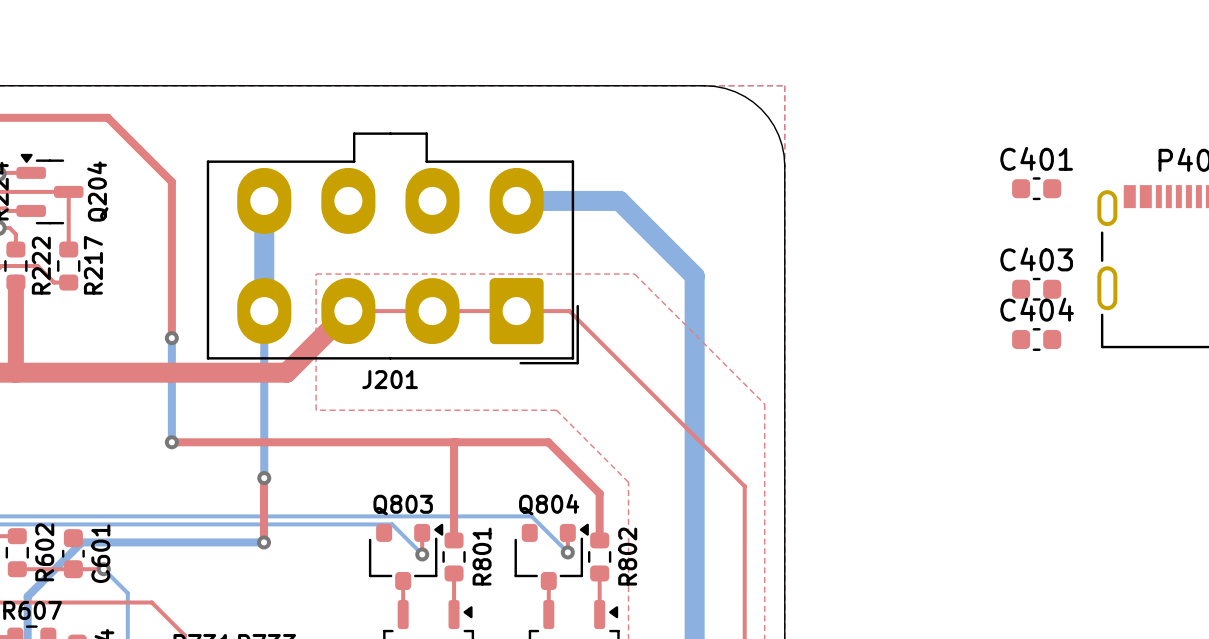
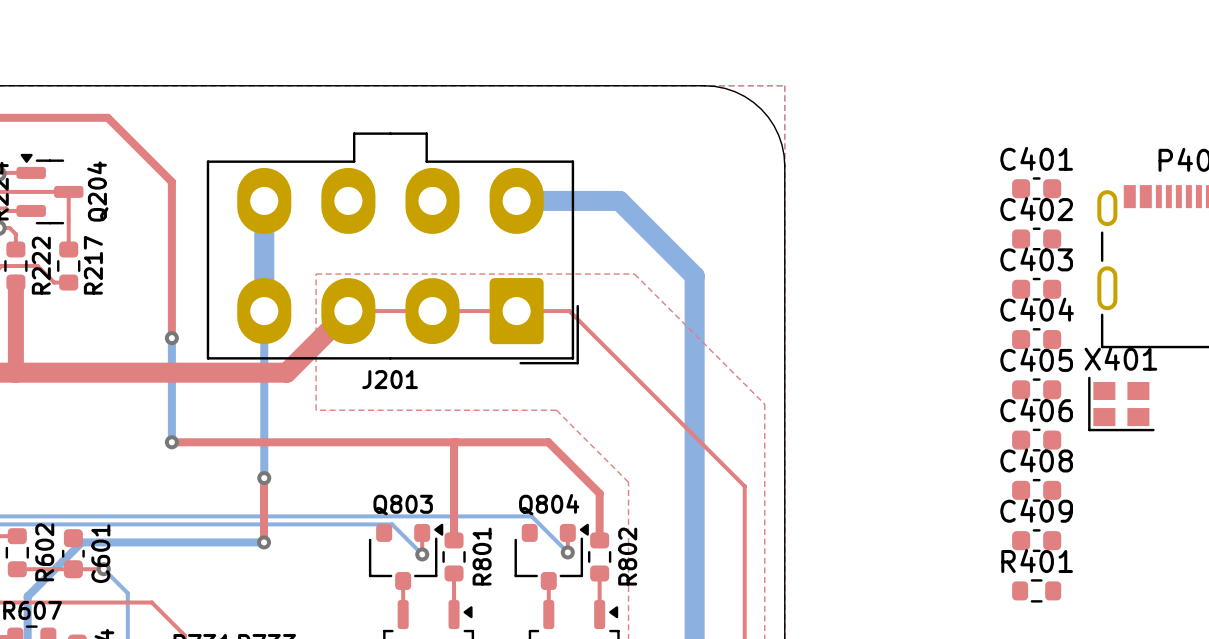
C402: none -> (1036, 238)
C405: none -> (1036, 389)
X401: none -> (1121, 404)
C406: none -> (1036, 440)
C408: none -> (1036, 490)
C409: none -> (1036, 540)
R401: none -> (1036, 590)

